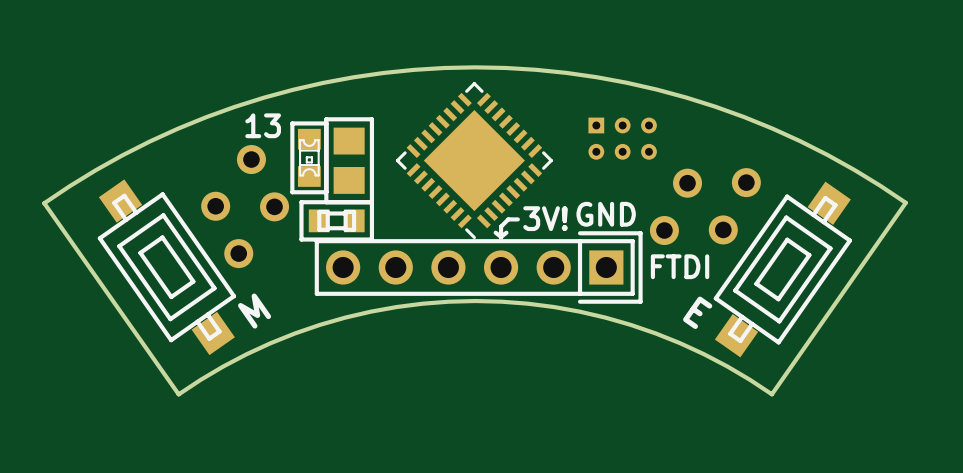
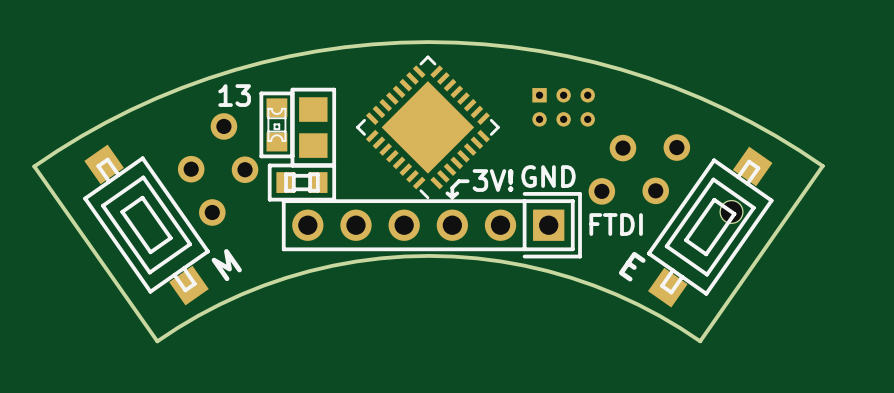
part: none -> (731, 211)

